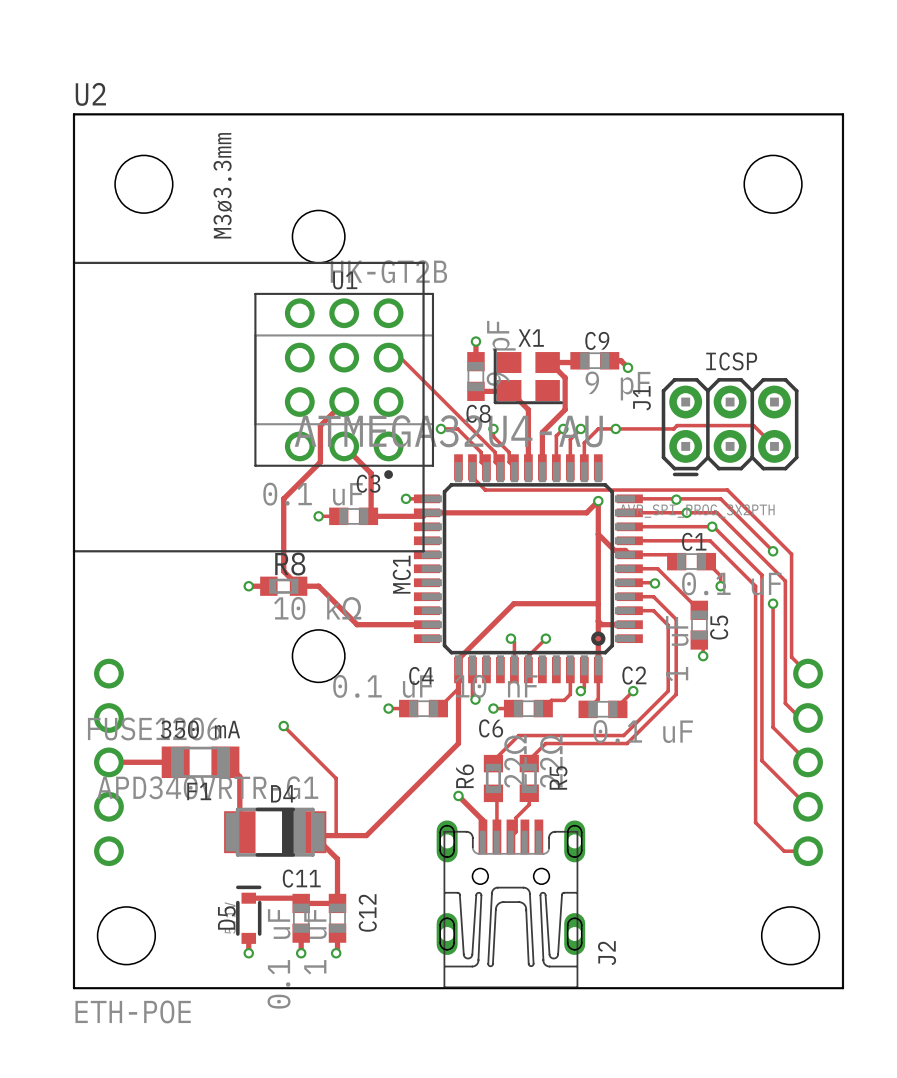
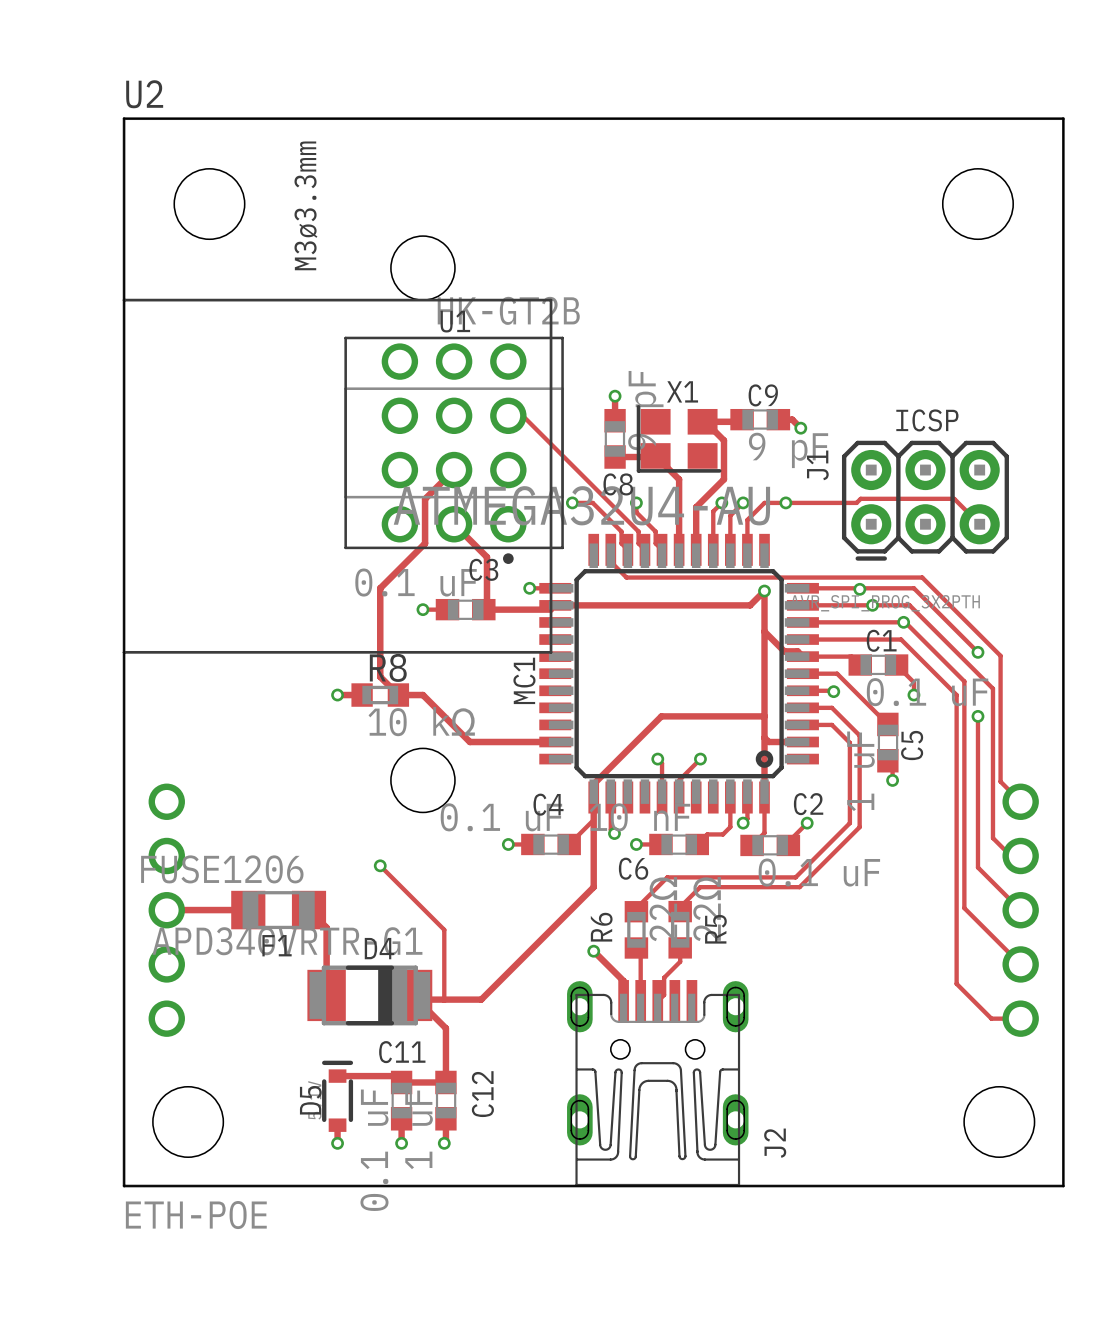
text: 350 mA (200, 729) -> none

